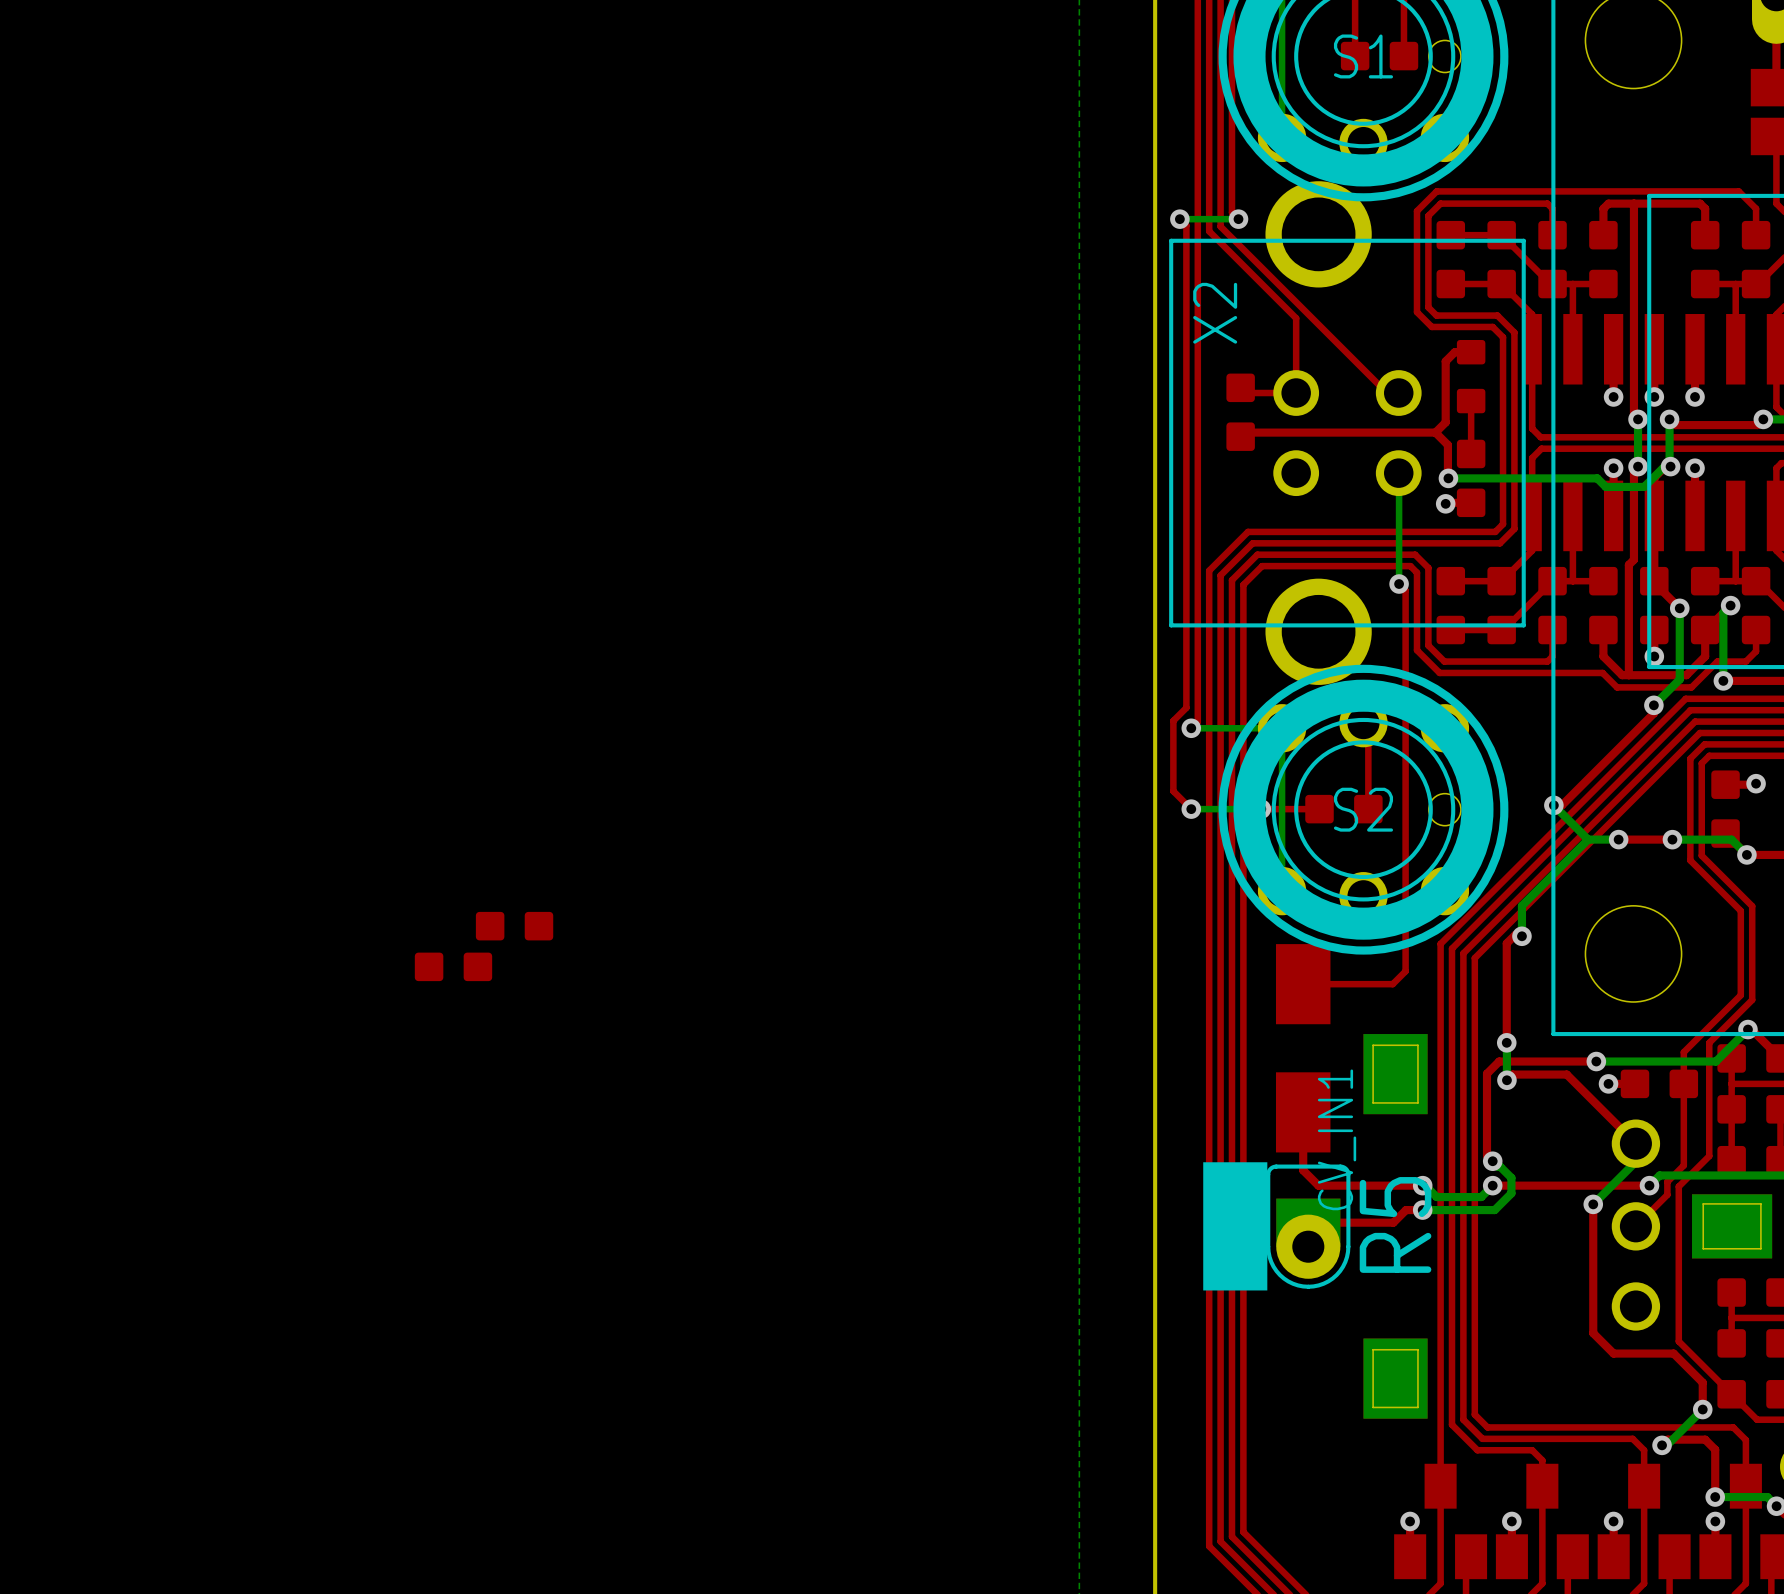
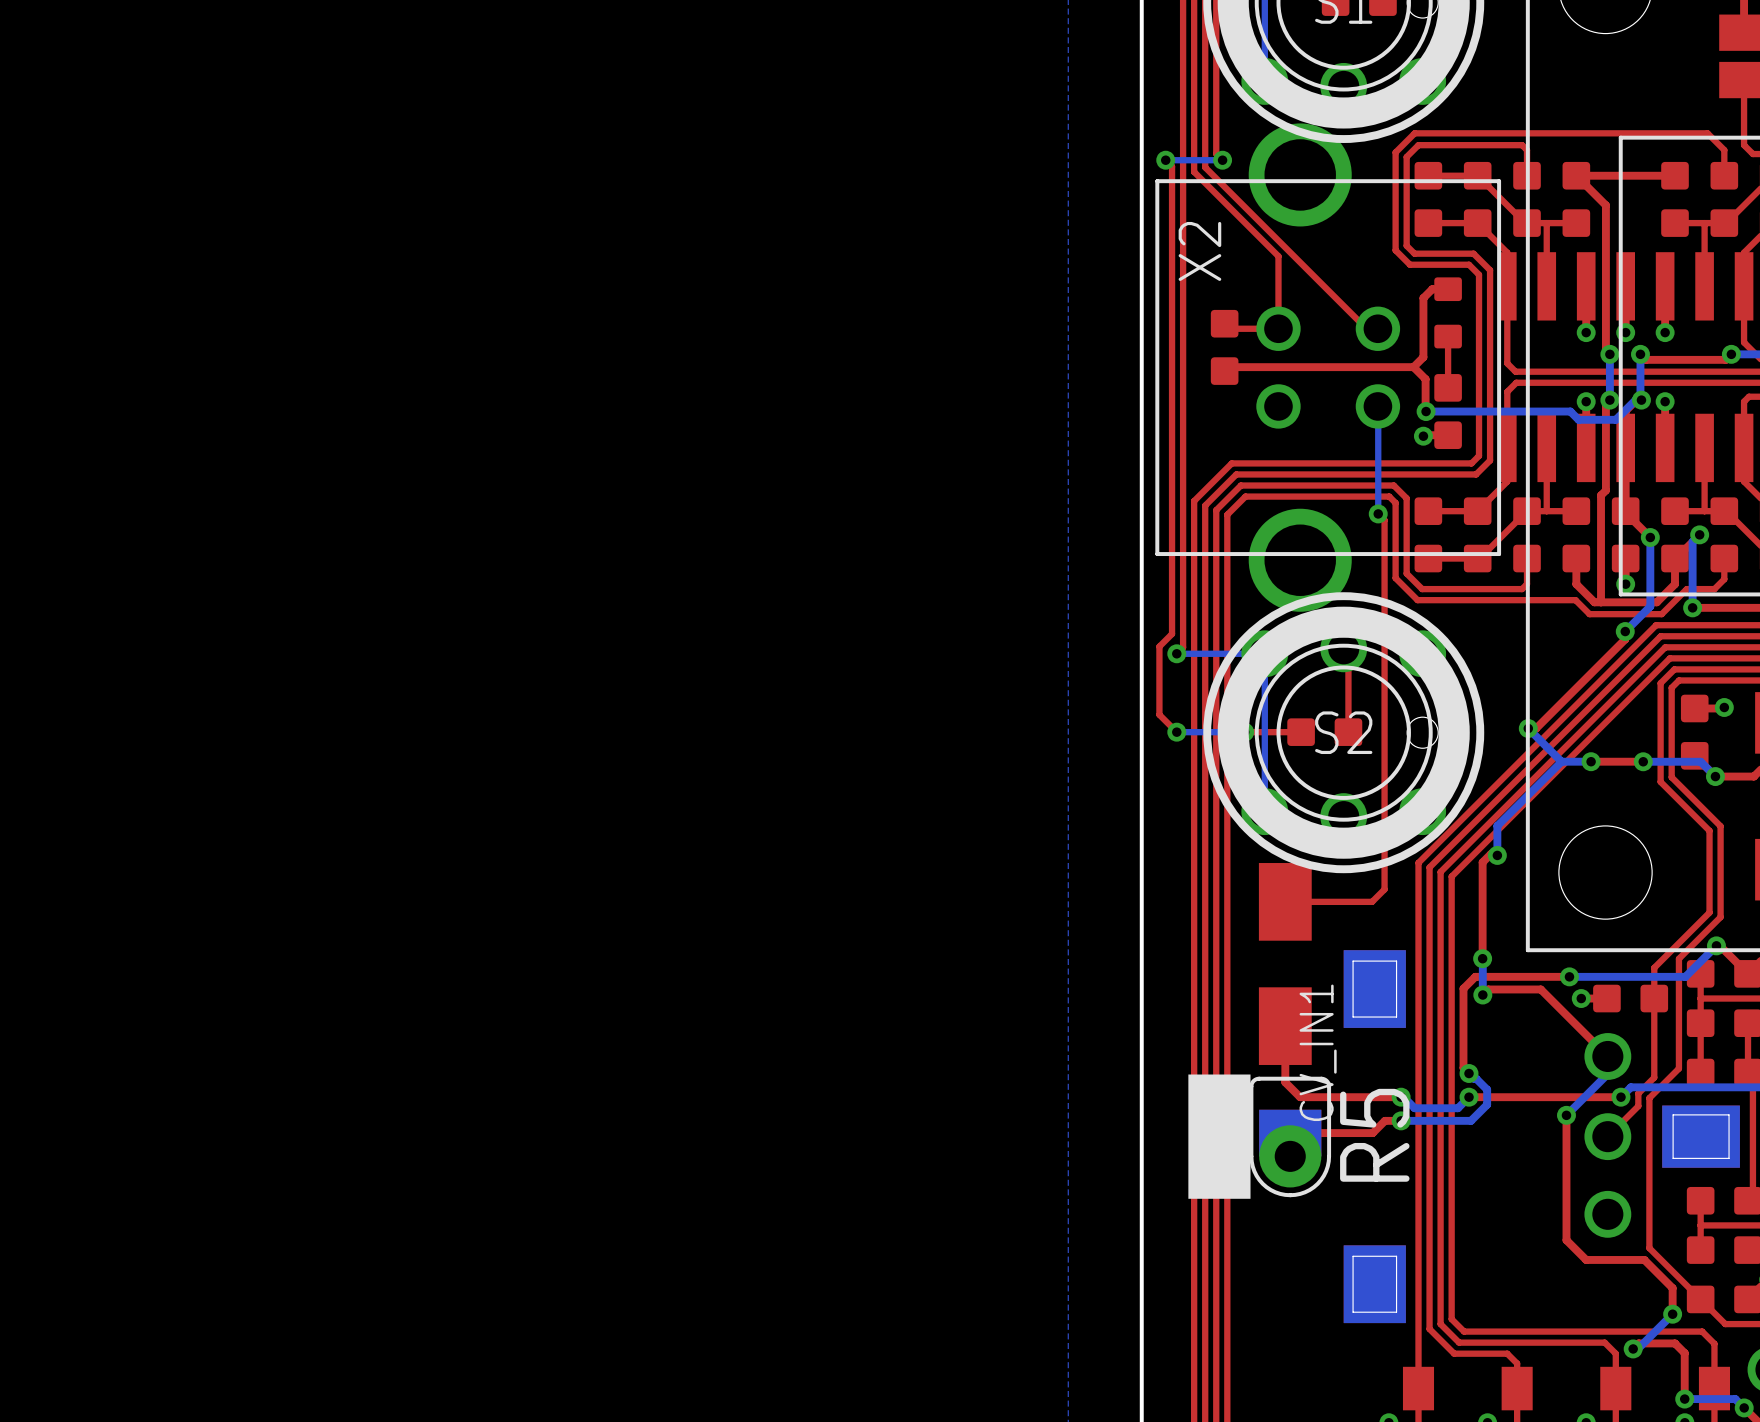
top track: (1633, 203) (1633, 265) -> none
top track: (1705, 235) (1705, 208) (1700, 203) (1608, 203) (1603, 208) (1603, 235) -> (1675, 175) (1576, 175) (1605, 205)
part: (514, 926) -> none
part: (453, 966) -> none

